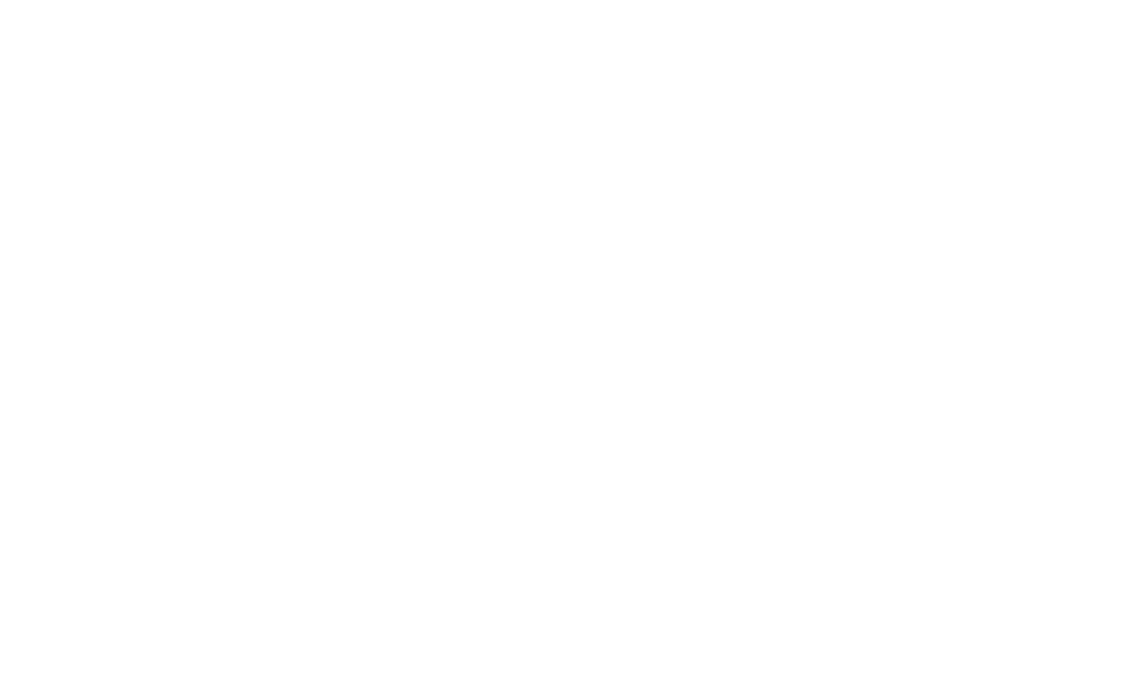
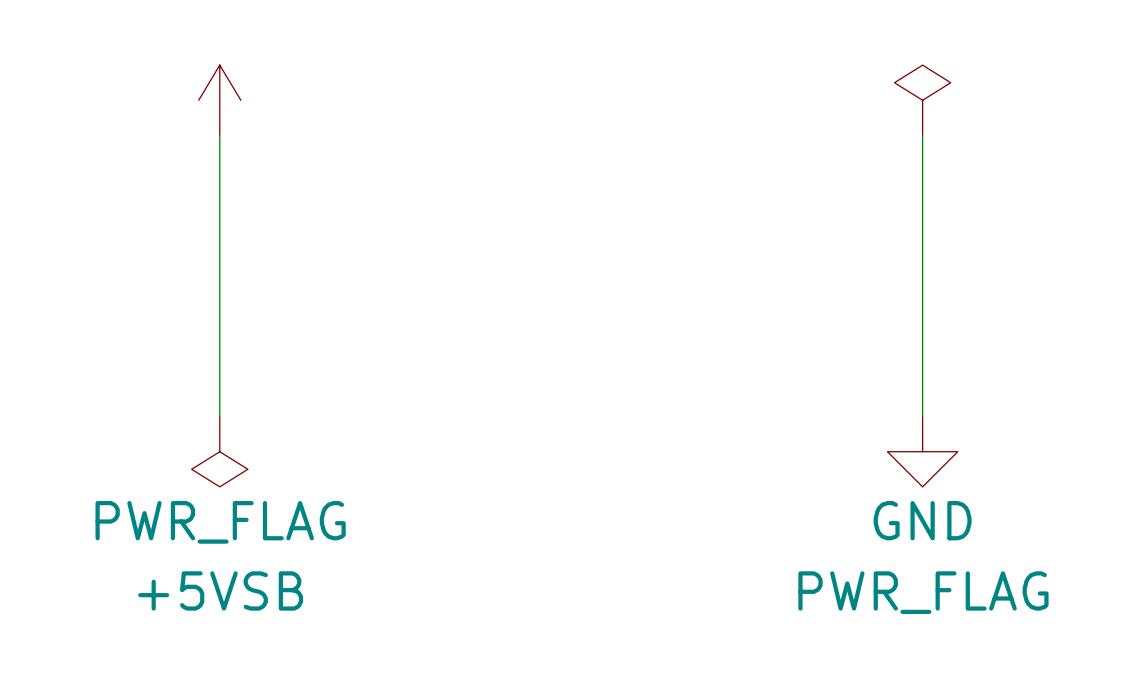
power symbol: none -> +5VSB (219, 100)
power symbol: none -> PWR_FLAG (922, 100)
wire: none -> (219, 135) (219, 416)
wire: none -> (922, 135) (922, 416)
power symbol: none -> PWR_FLAG (219, 451)
power symbol: none -> GND (922, 451)

